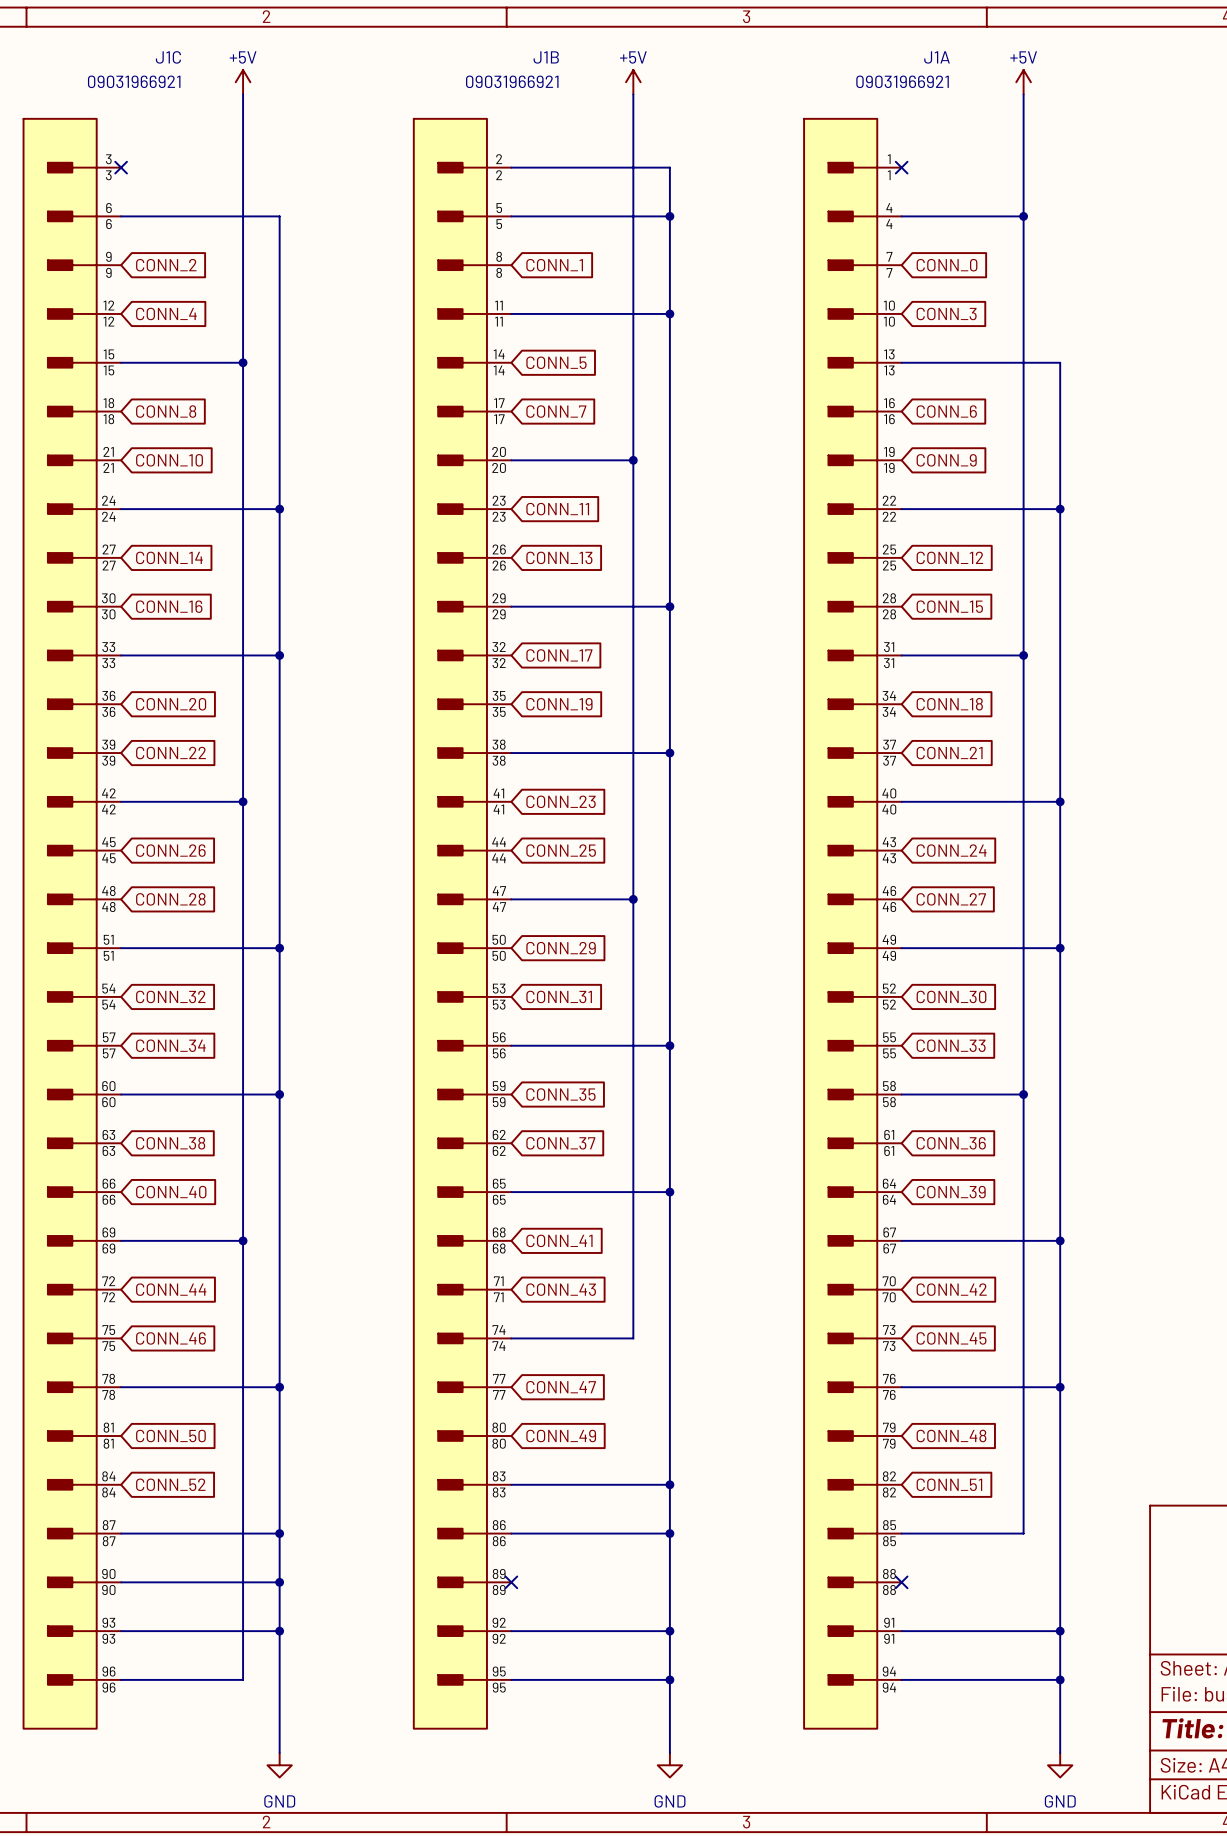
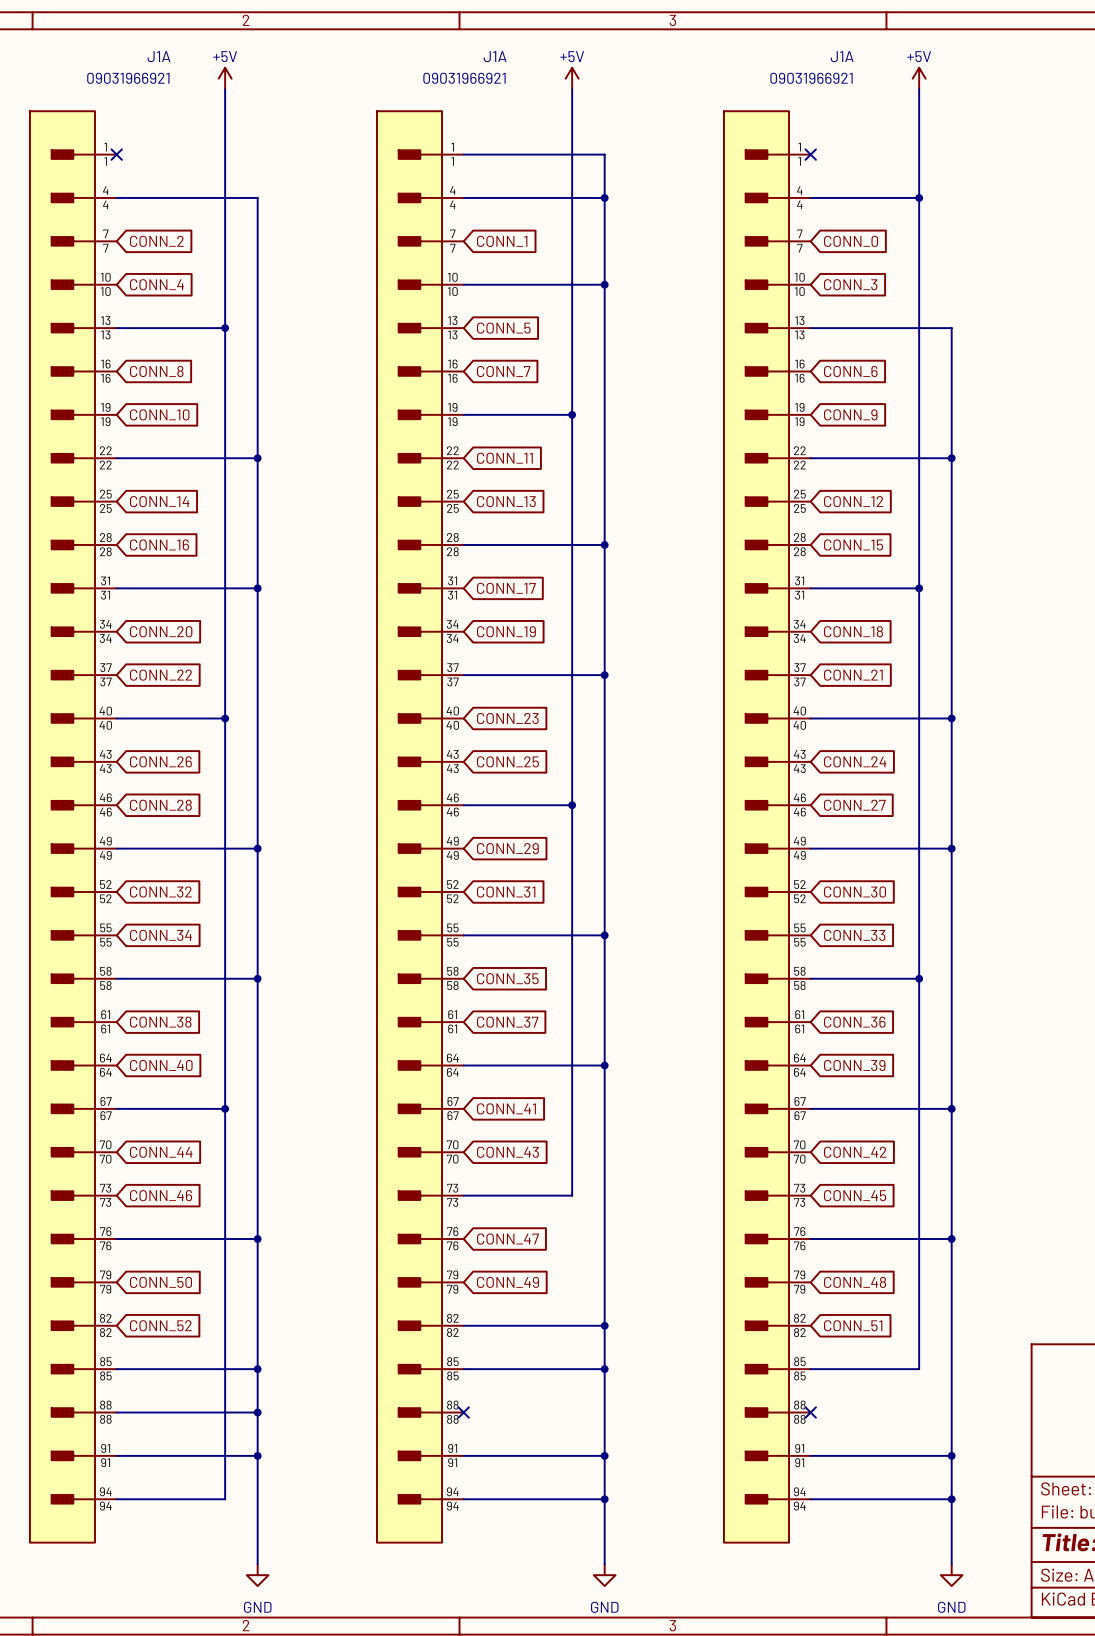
J1C name: J1C (168, 57) -> J1A (158, 56)
J1B name: J1B (546, 57) -> J1A (495, 56)
J1C symbol: [23, 118, 122, 1729] -> [29, 111, 117, 1543]
J1B symbol: [413, 118, 512, 1729] -> [376, 111, 464, 1543]

